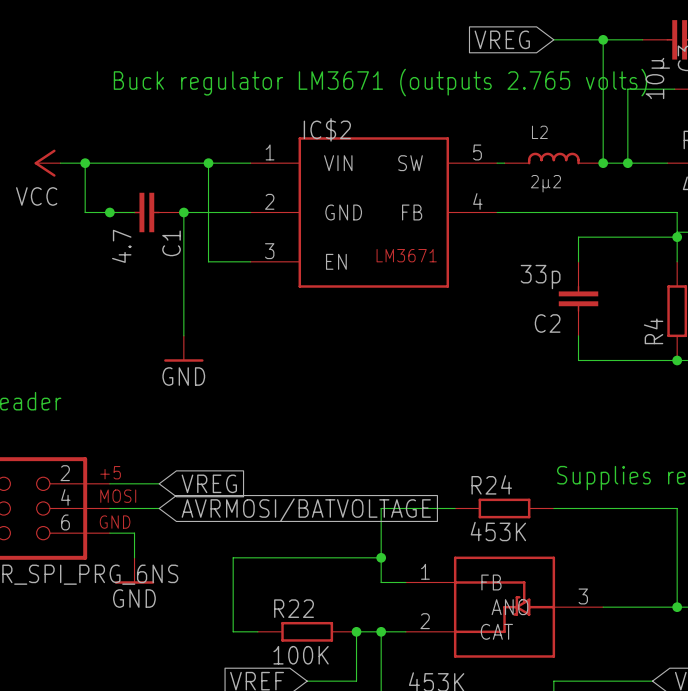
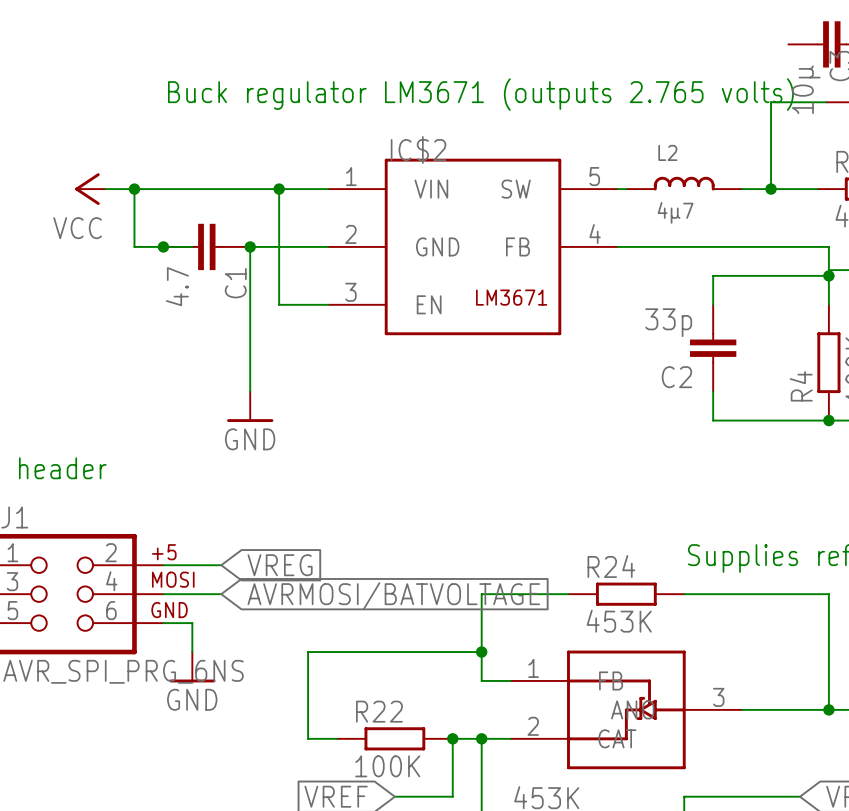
global label: VREG (502, 39) -> none
wire: (553, 39) (642, 39) -> none
wire: (603, 39) (603, 163) -> none
junction: (603, 39) -> none
junction: (603, 163) -> none
L2 value: 2µ2 (545, 183) -> 4µ7 (675, 212)

